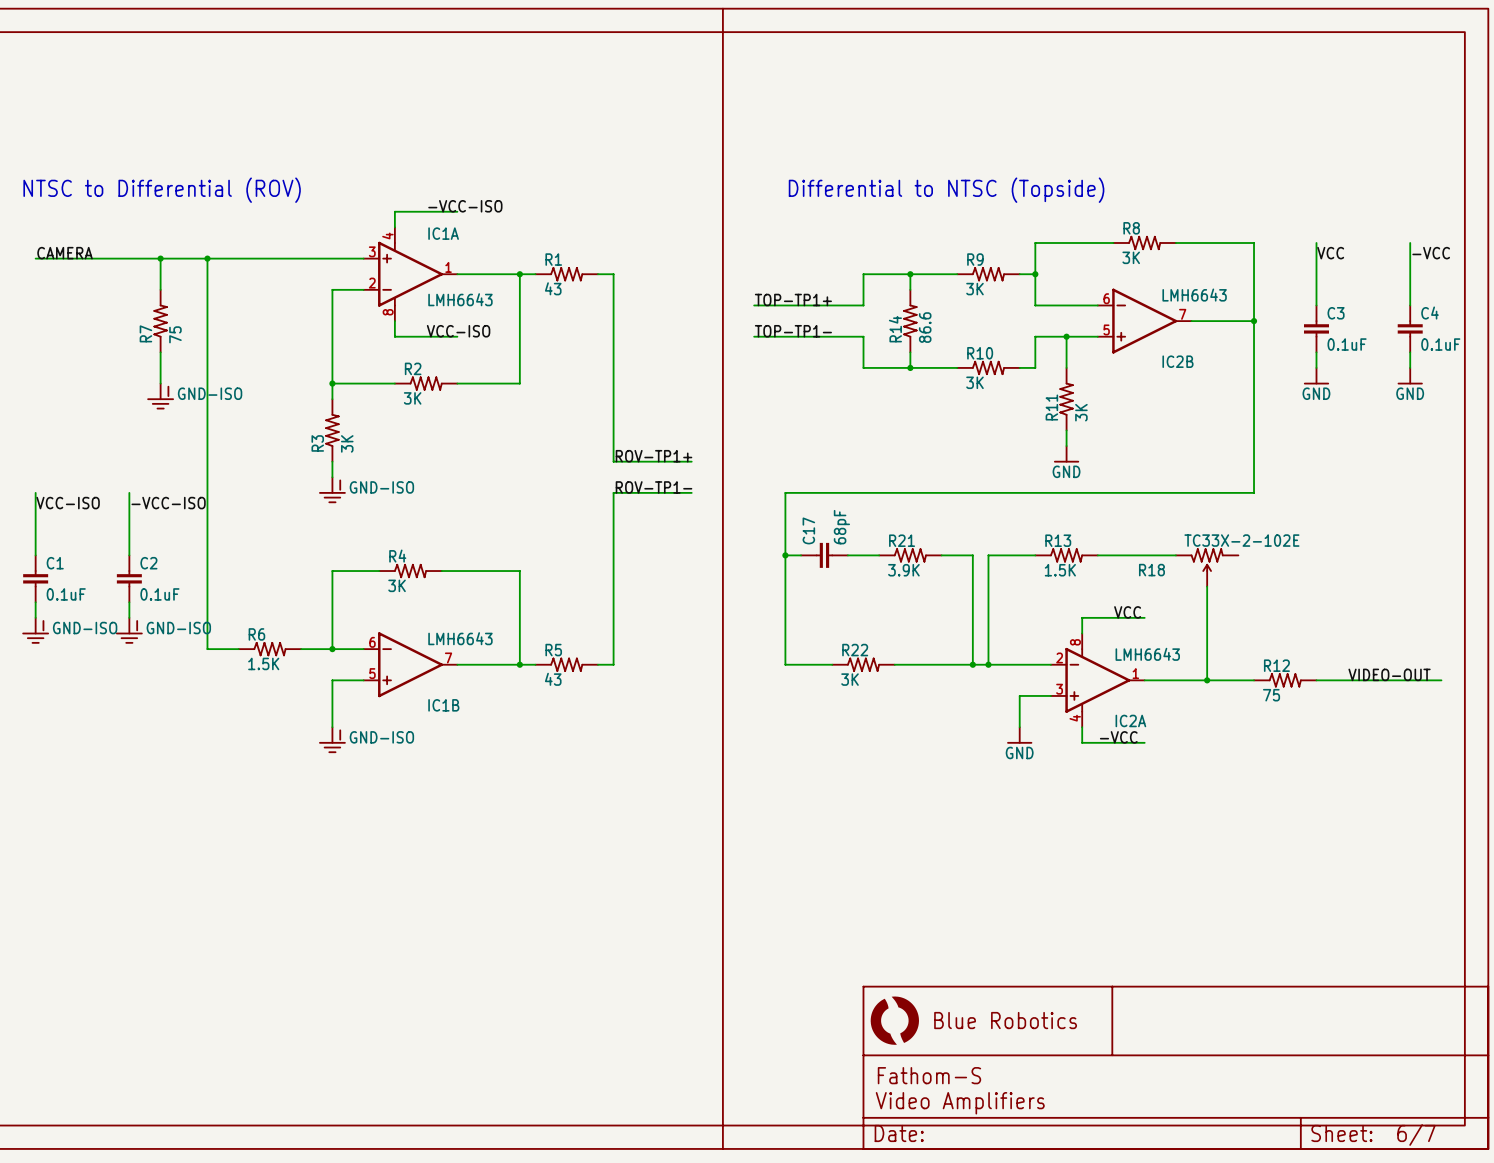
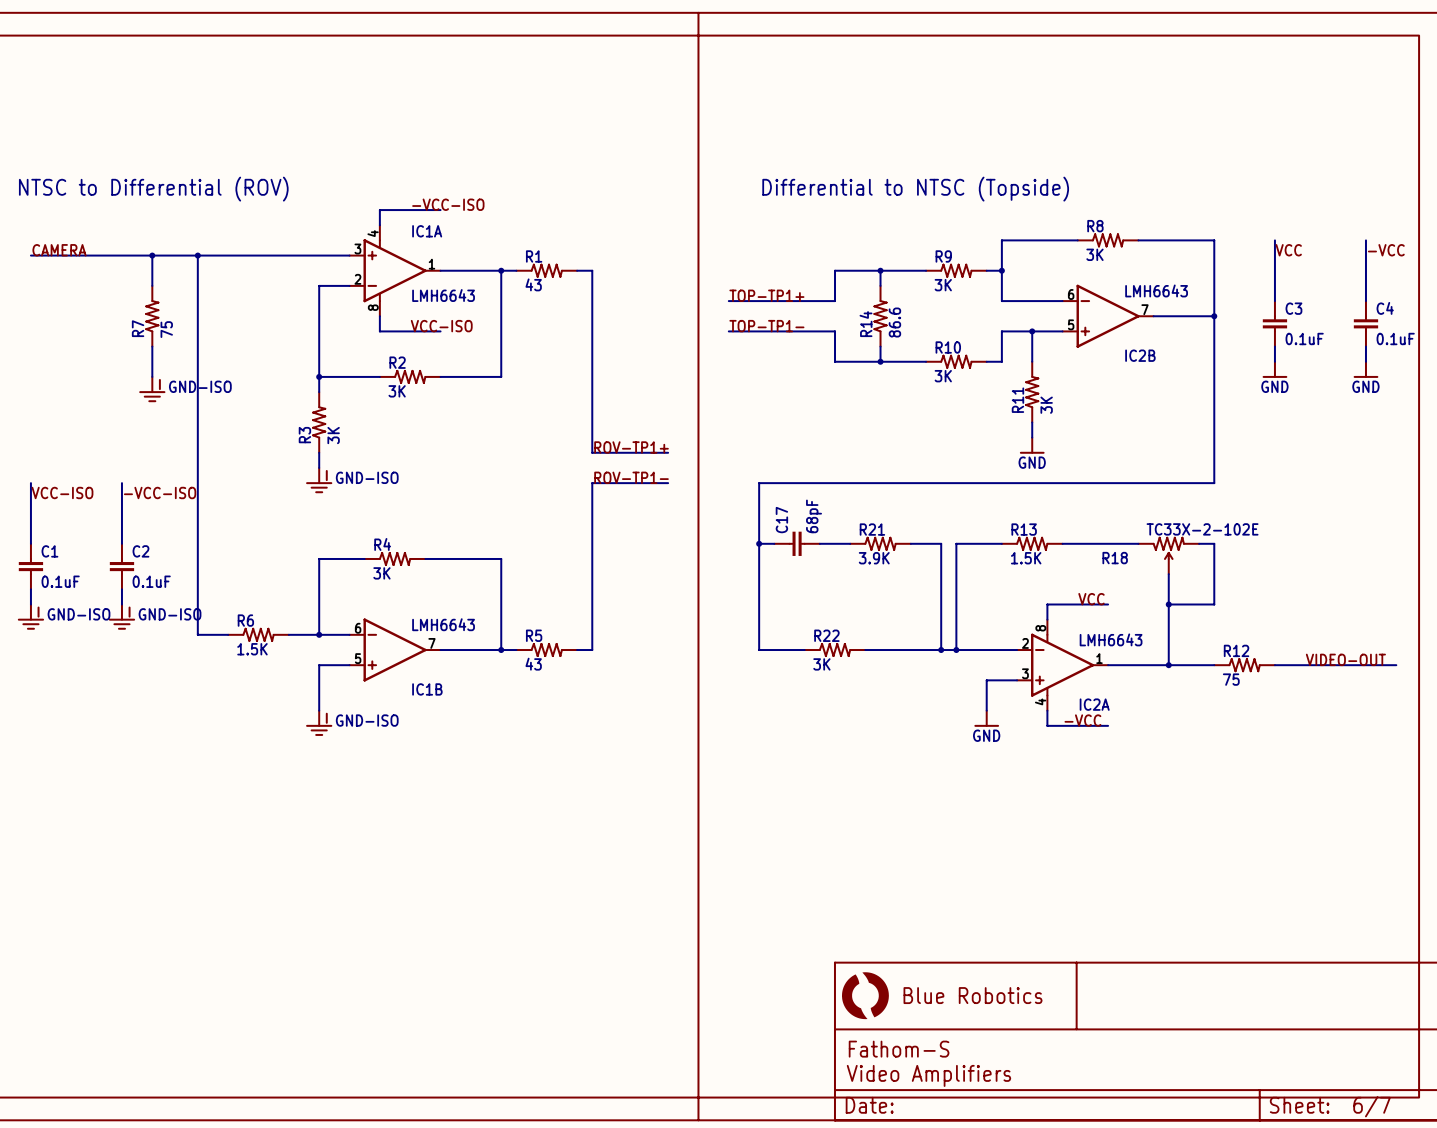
wire: none -> (1199, 543) (1214, 543) (1214, 604) (1168, 604)
junction: none -> (1168, 604)

